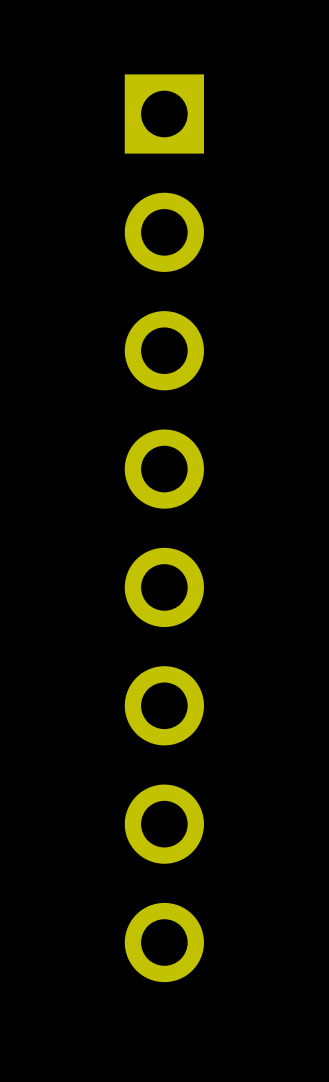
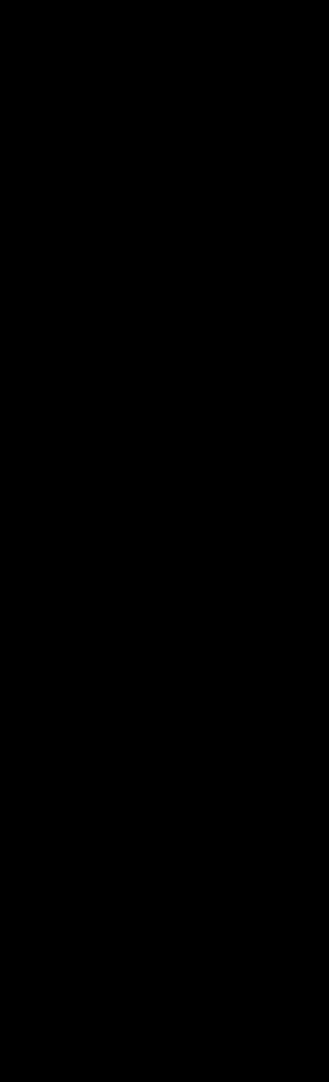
part: (164, 528) -> none

